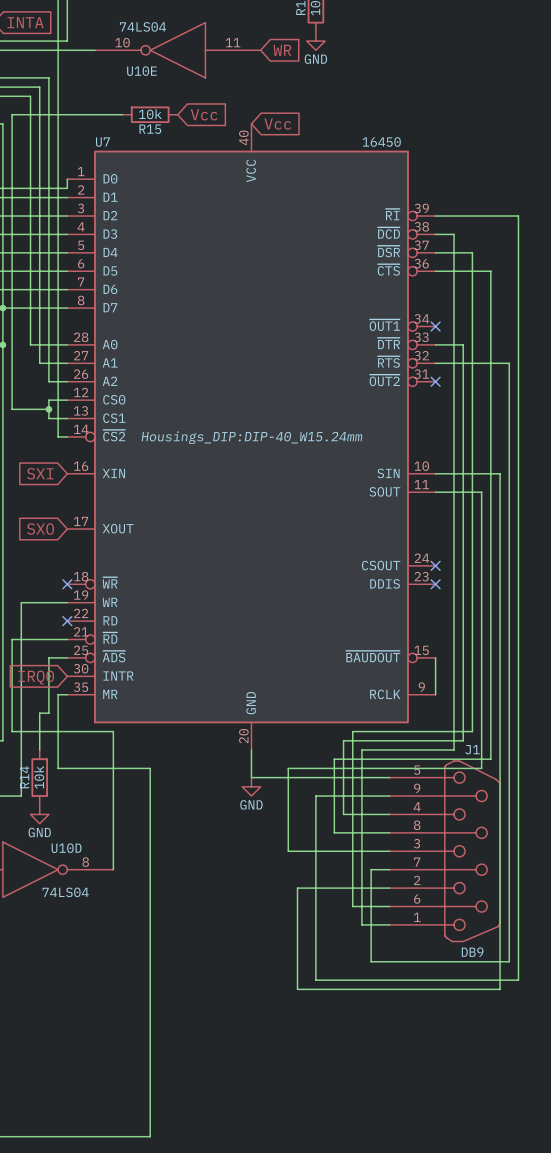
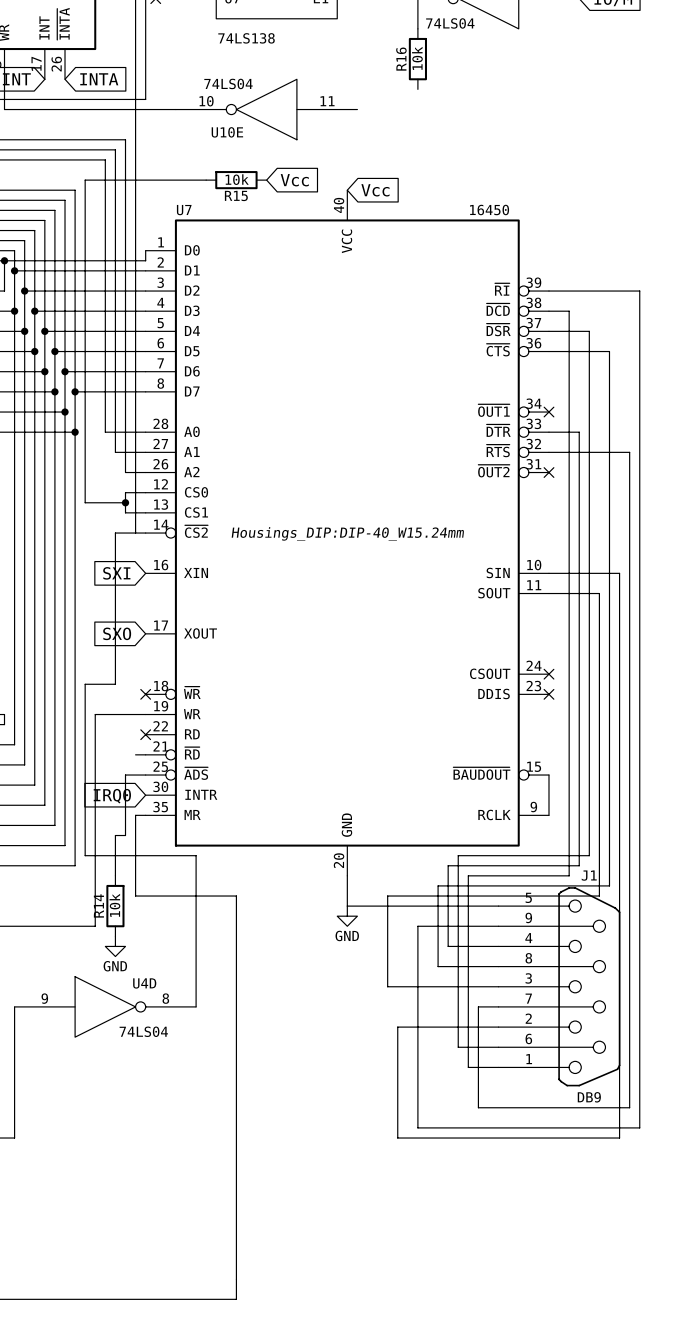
power symbol: GND (315, 41) -> none
global label: WR (282, 50) -> none
wire: (12, 639) (58, 639) -> (85, 754) (85, 684) (115, 684) (115, 533) (135, 533)
U10D name: U10D (66, 848) -> U4D (144, 983)

